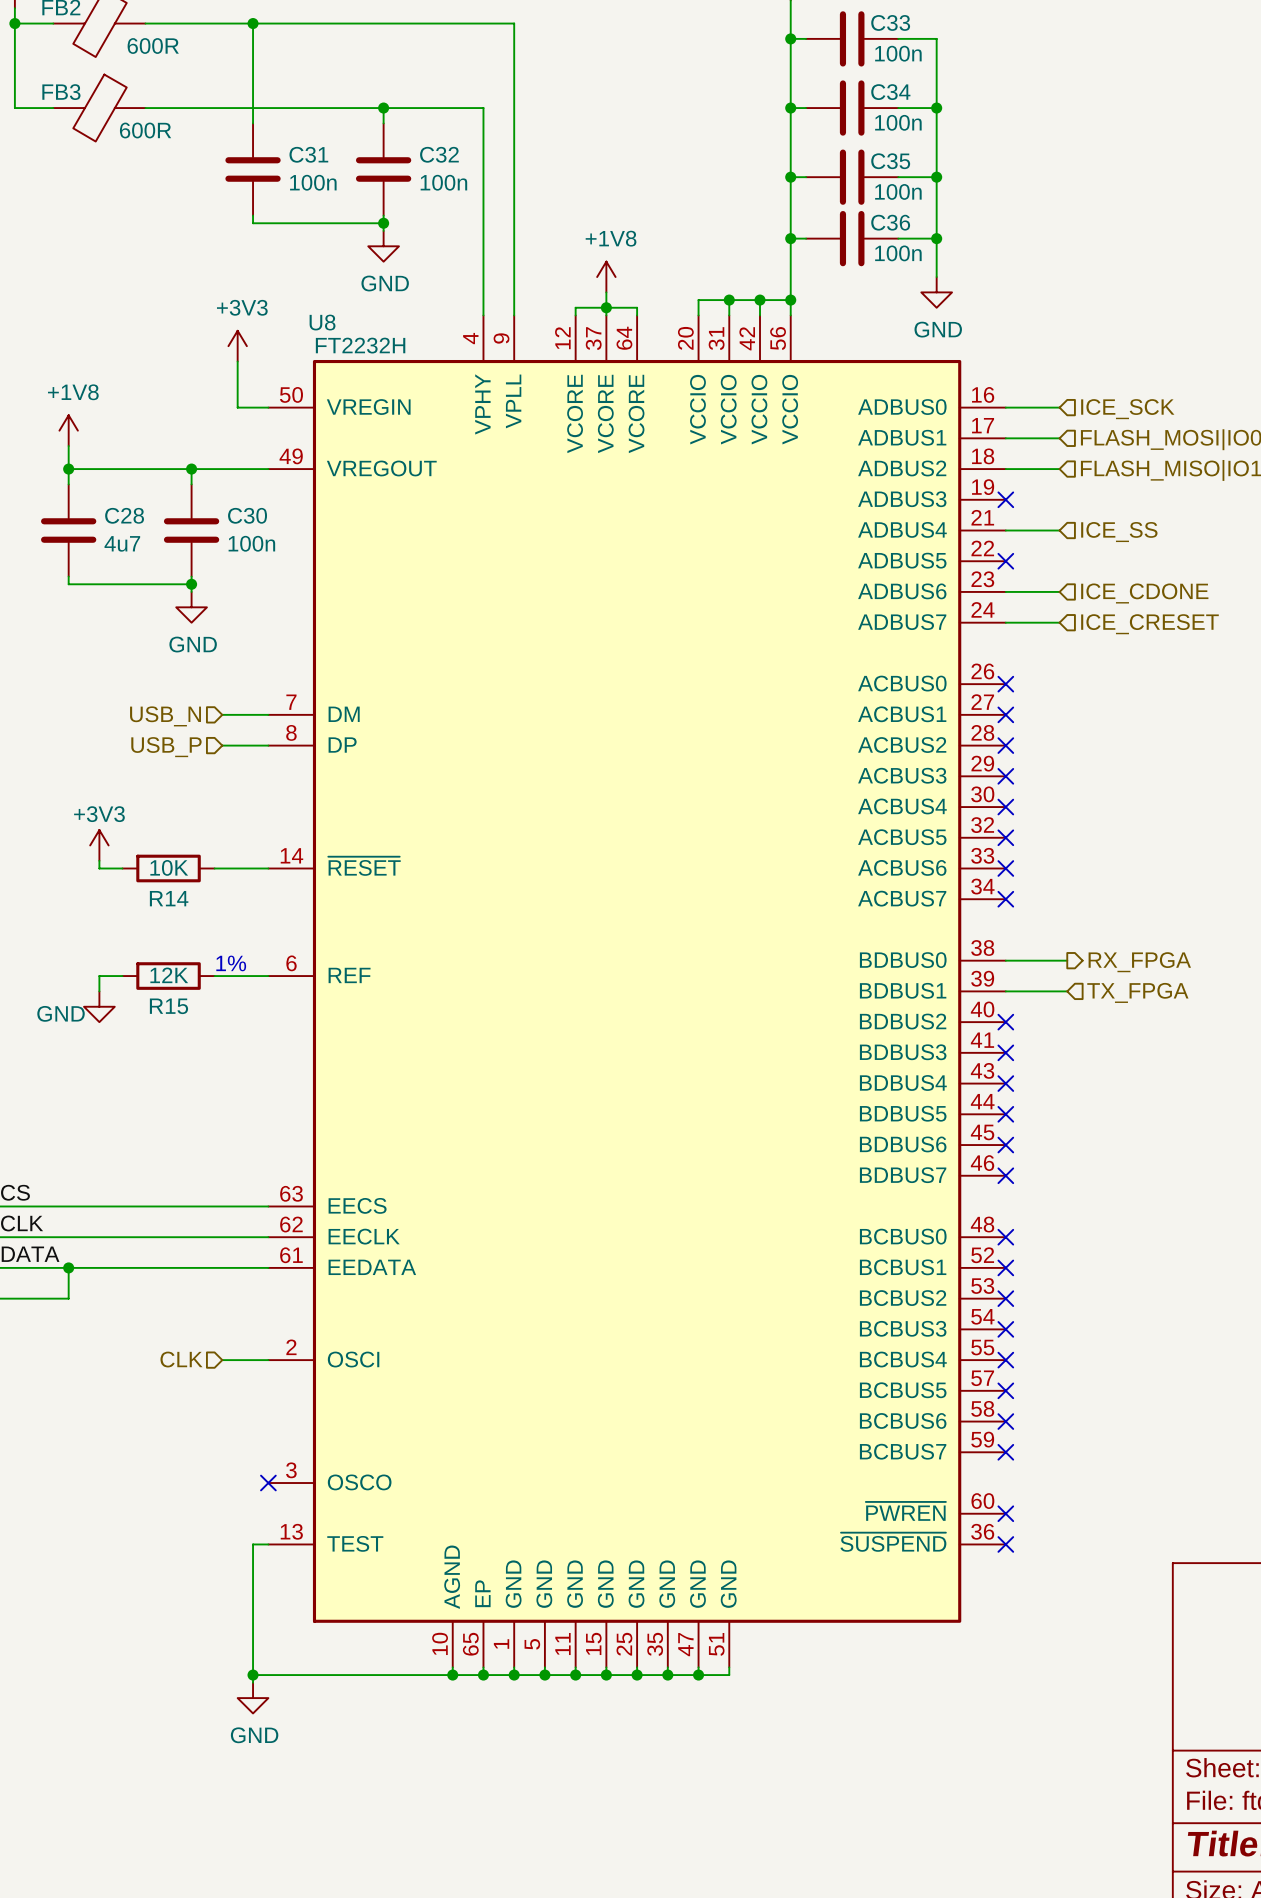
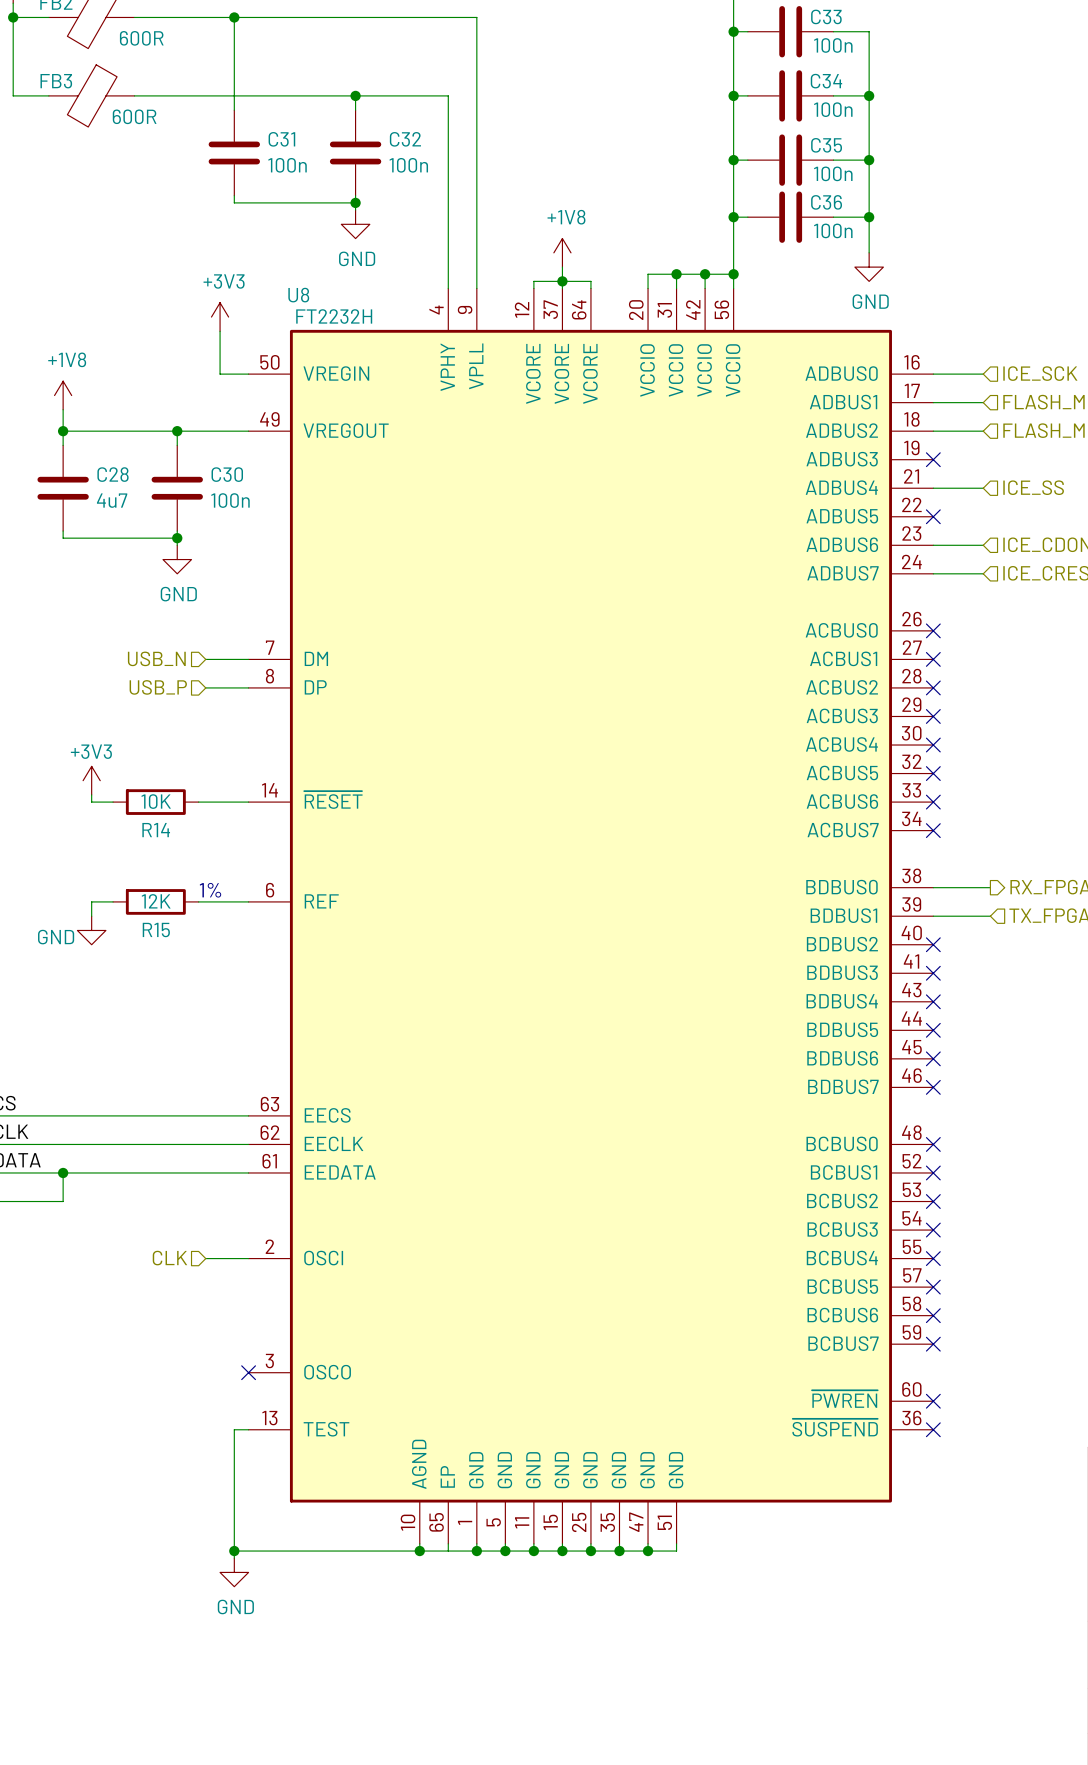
junction: (483, 1675) -> none

